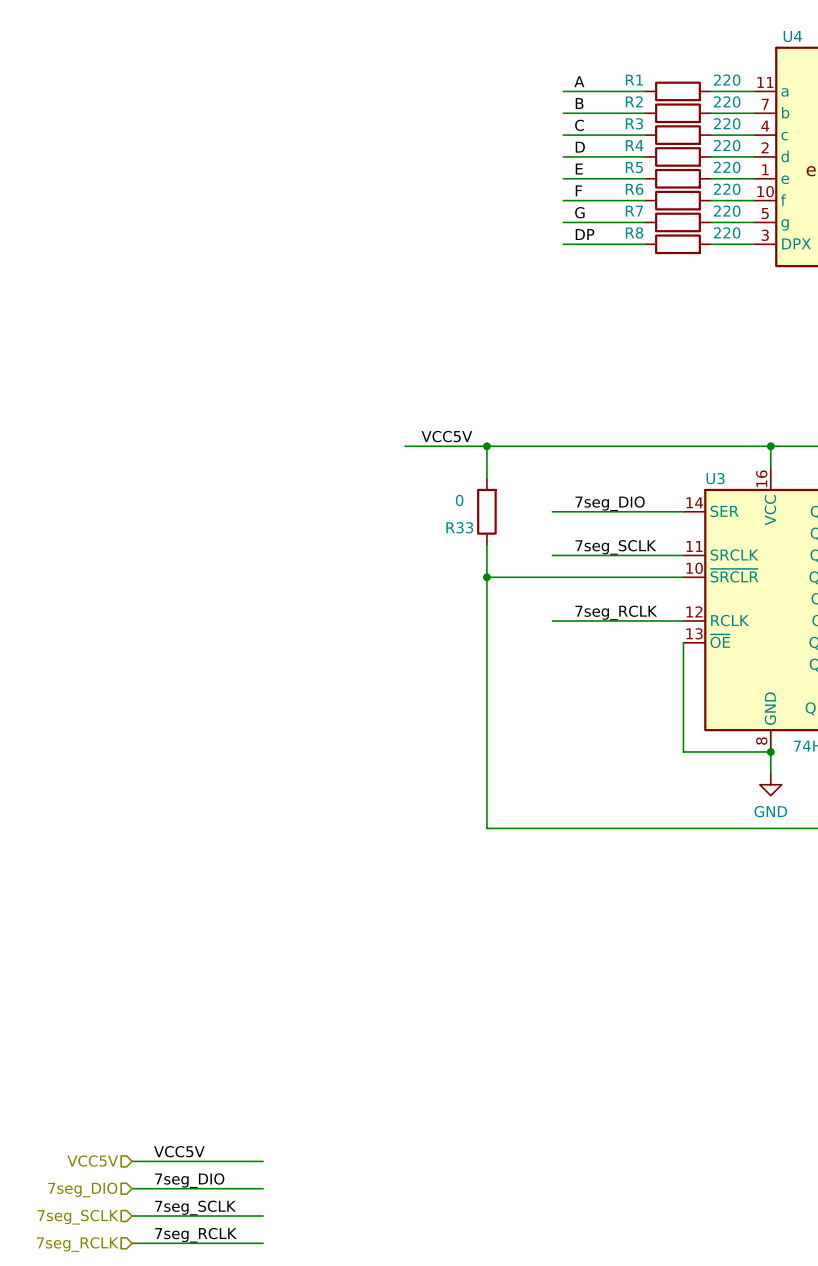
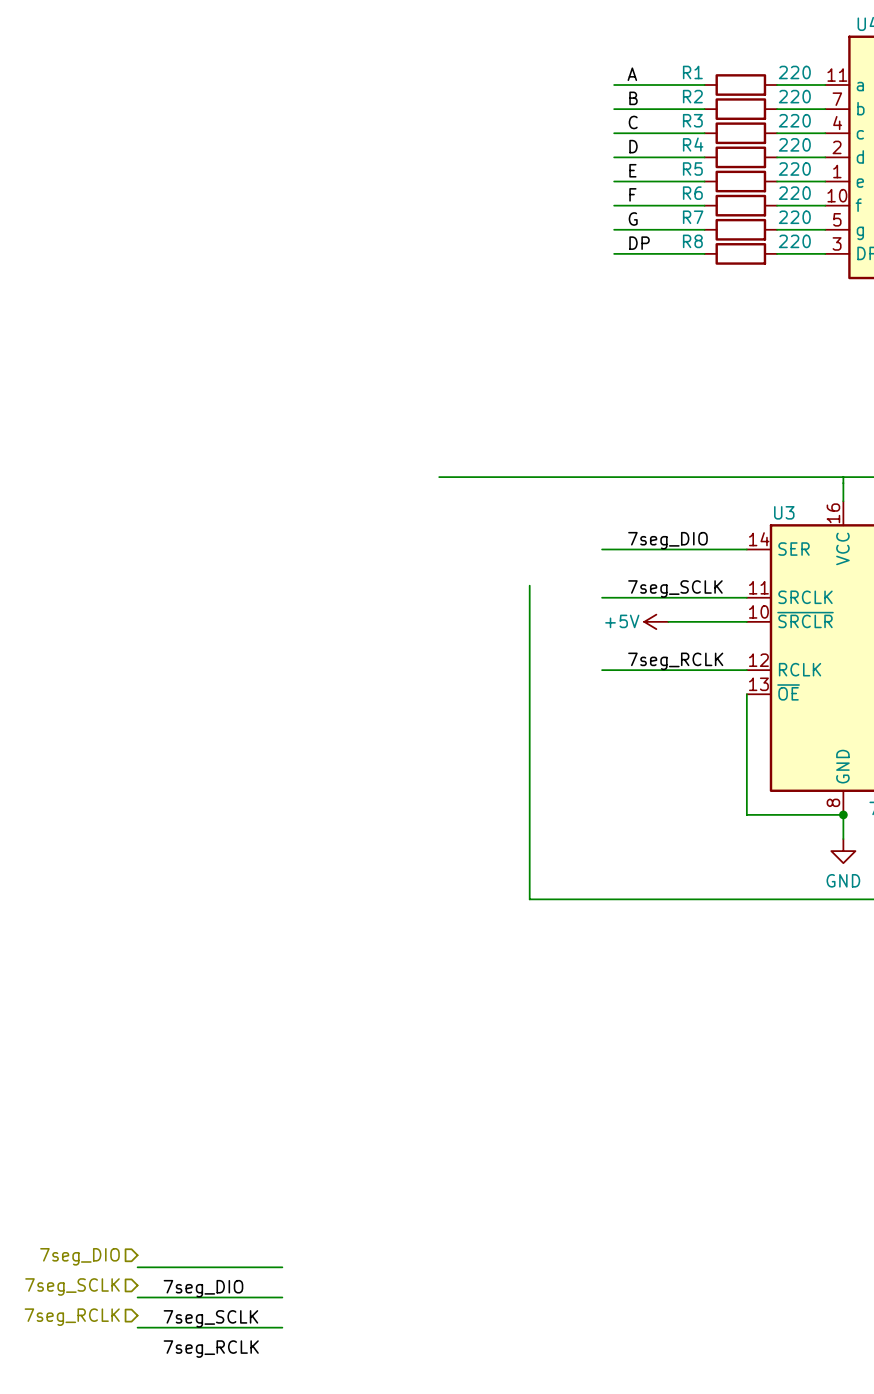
label: VCC5V (446, 436) -> none
wire: (486, 446) (486, 479) -> none
junction: (486, 446) -> none
junction: (770, 446) -> none
R33: 0 (486, 511) -> none
wire: (486, 577) (612, 577) -> none
junction: (486, 577) -> none
power symbol: none -> +5V (656, 621)
label: VCC5V (179, 1151) -> none
hierarchical label: VCC5V (92, 1161) -> none
hierarchical label position: 7seg_DIO (82, 1189) -> 7seg_DIO (79, 1256)
hierarchical label position: 7seg_SCLK (78, 1217) -> 7seg_SCLK (72, 1286)
wire: (132, 1243) (263, 1243) -> none
hierarchical label position: 7seg_RCLK (77, 1244) -> 7seg_RCLK (72, 1317)

